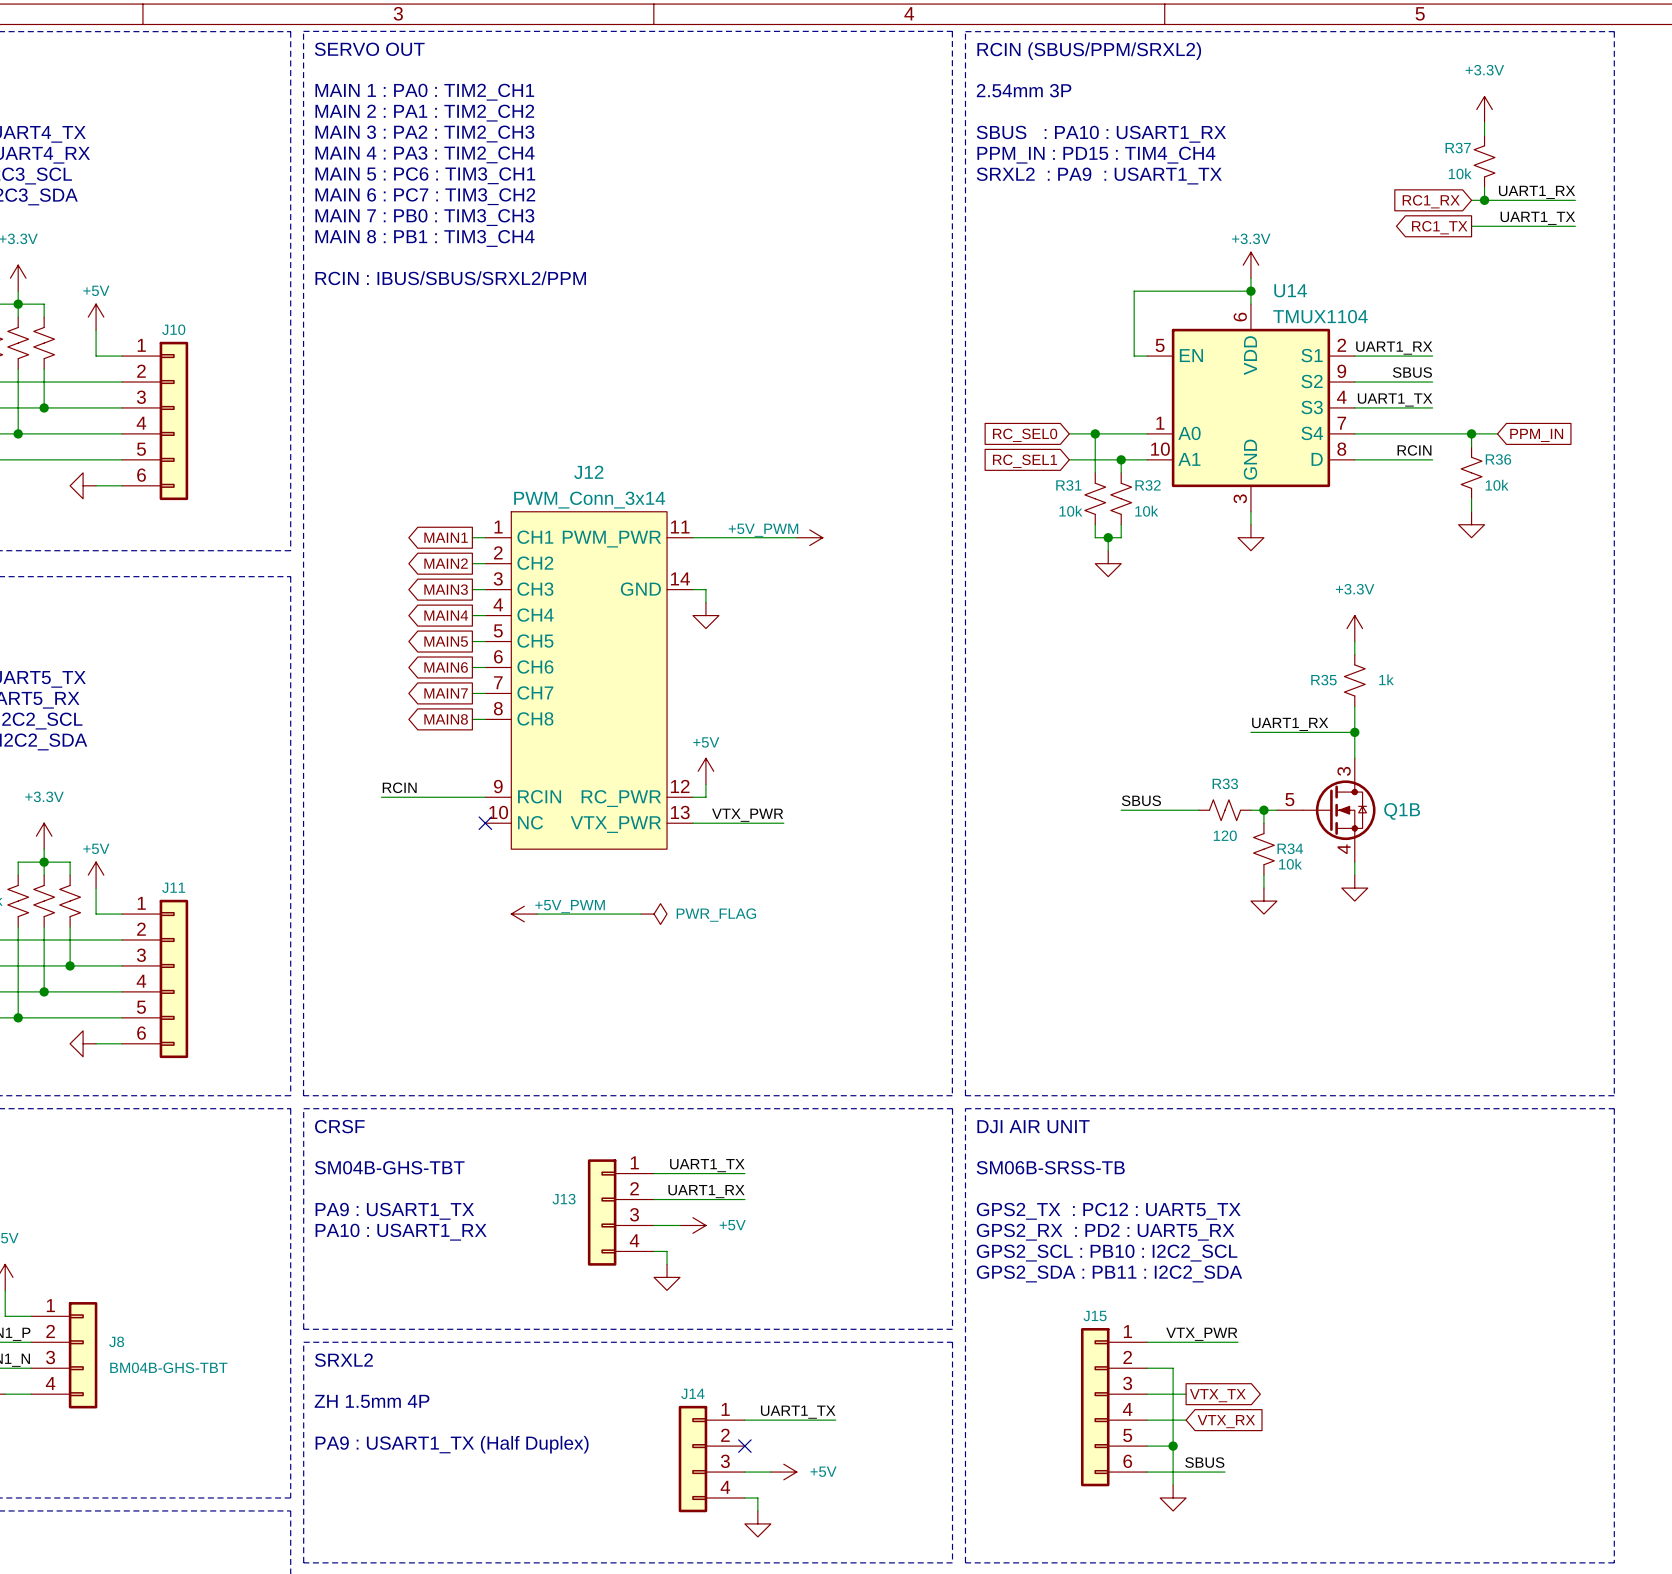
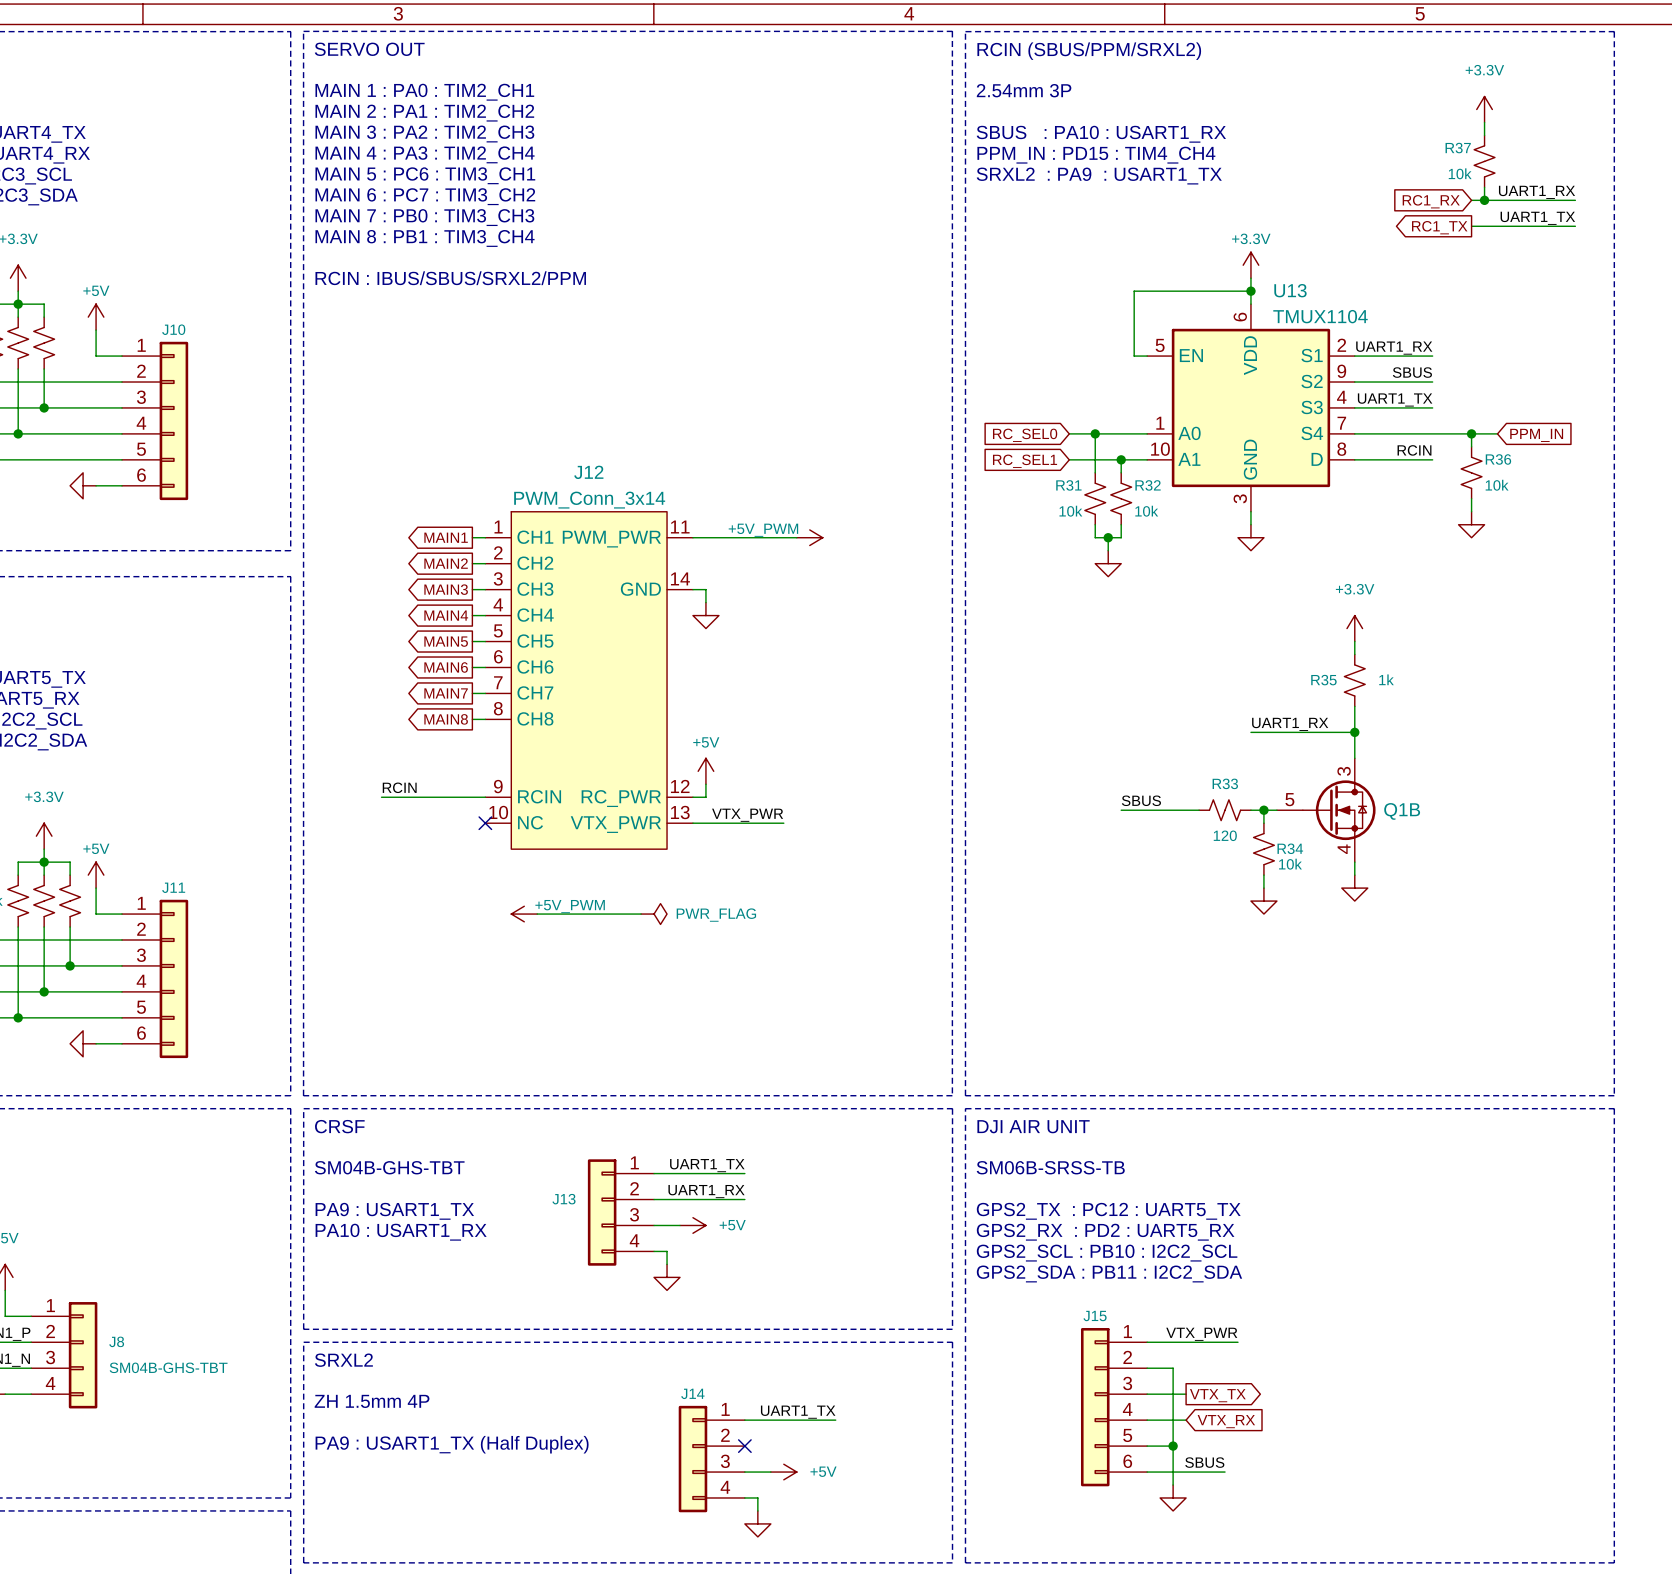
U14 name: U14 (1290, 290) -> U13 (1290, 290)
J8 value: BM04B-GHS-TBT (168, 1367) -> SM04B-GHS-TBT (168, 1367)

